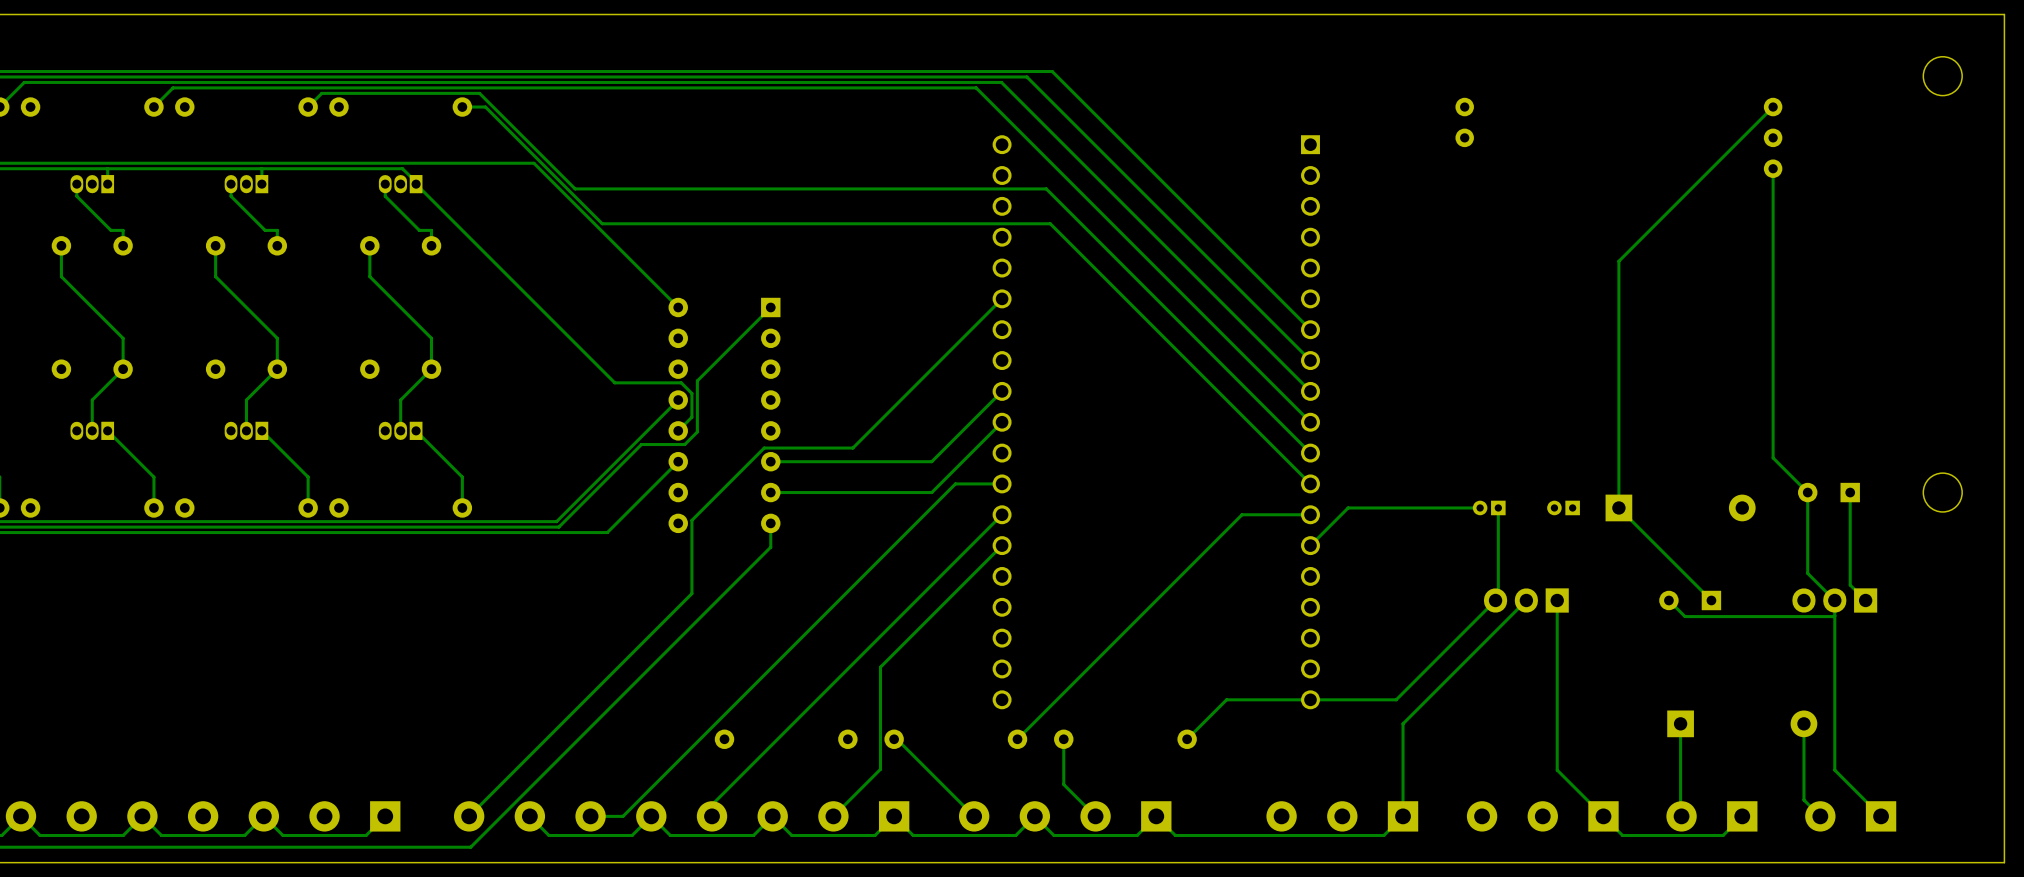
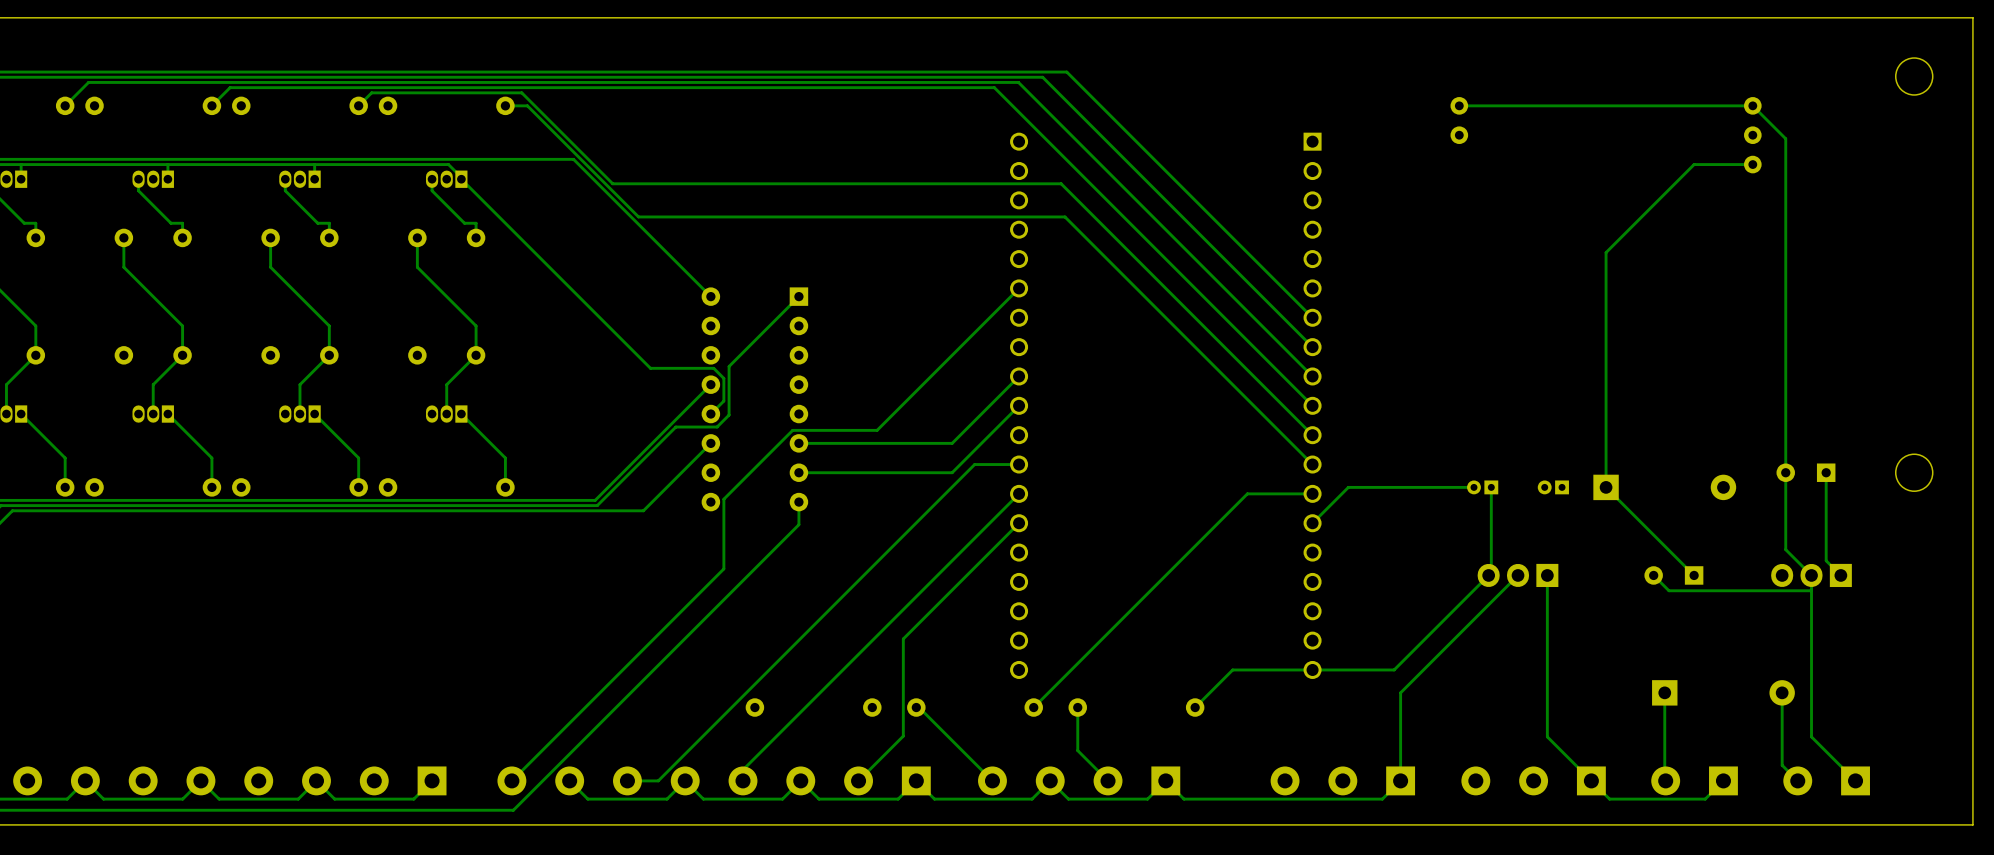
track: (1773, 107) (1711, 168) -> (1752, 164) (1694, 164)
track: (1773, 168) (1773, 457) (1807, 492) -> (1459, 105) (1752, 105) (1785, 138) (1785, 472)

